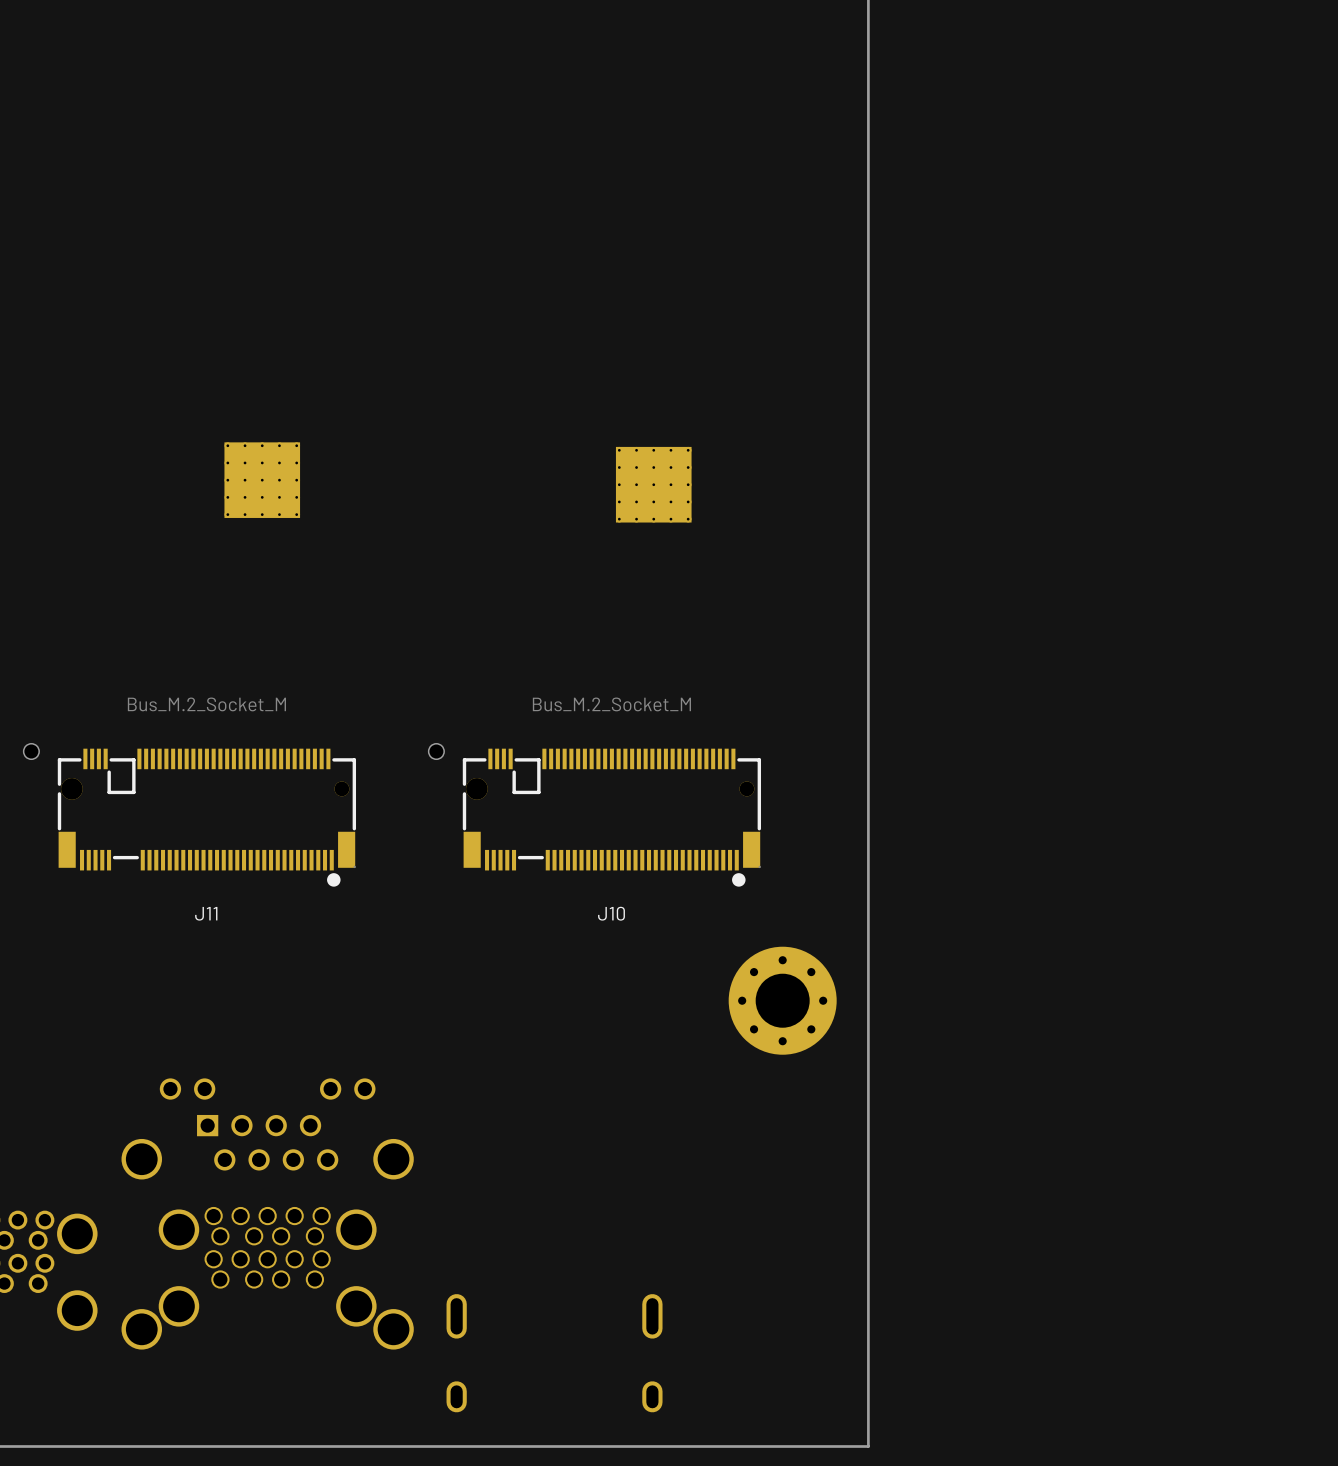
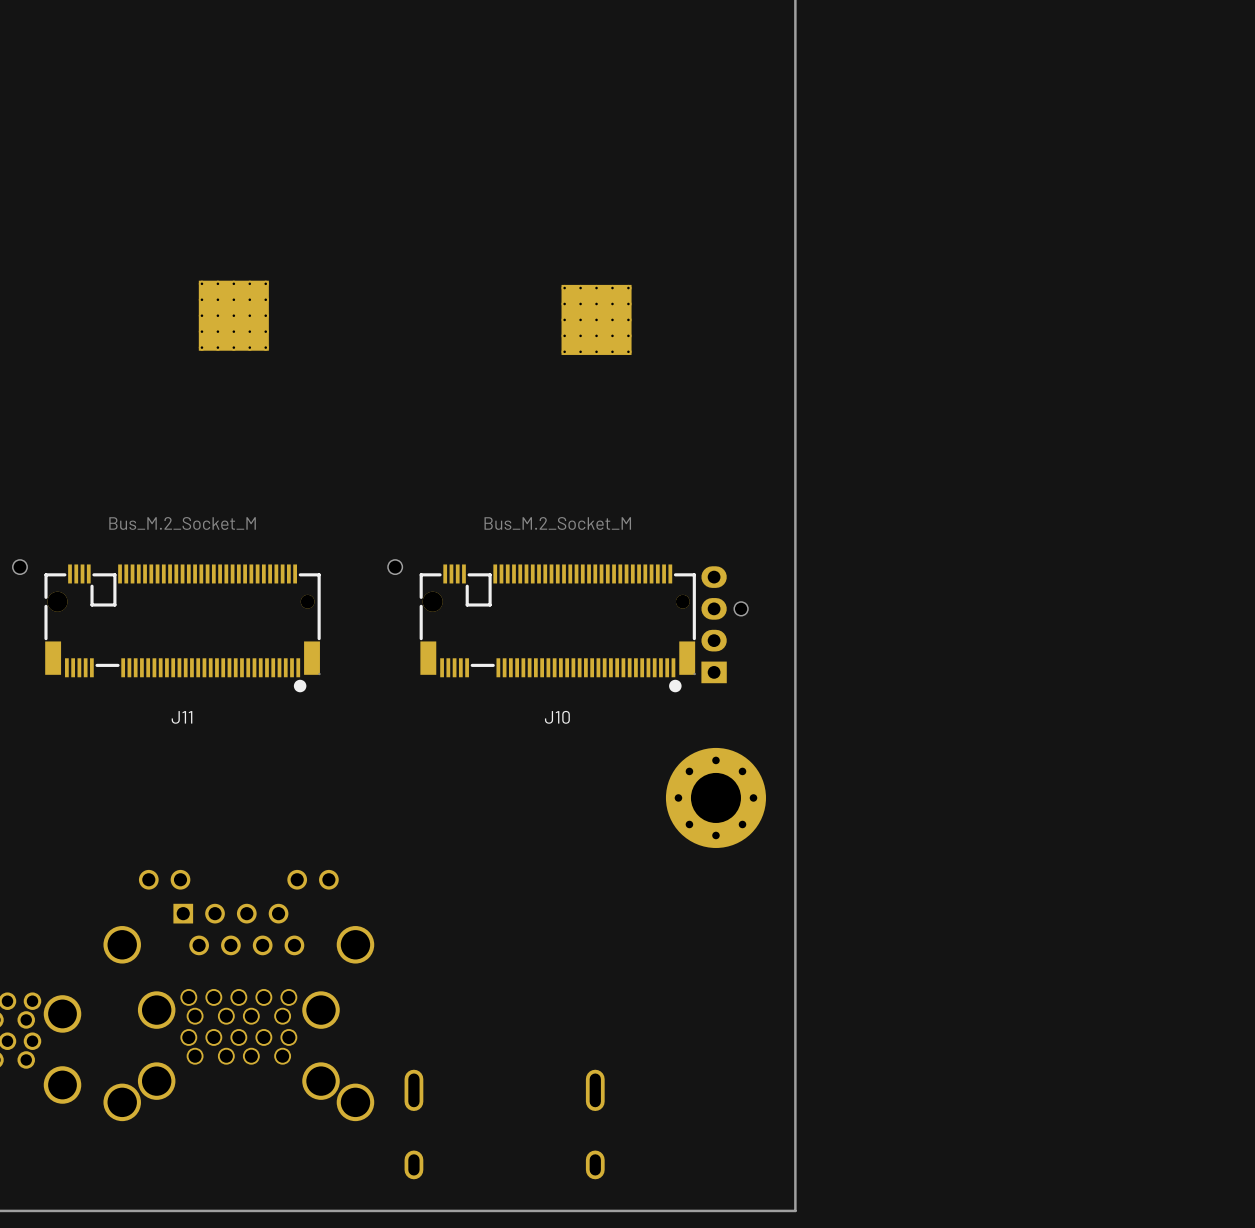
part: none -> (724, 624)

